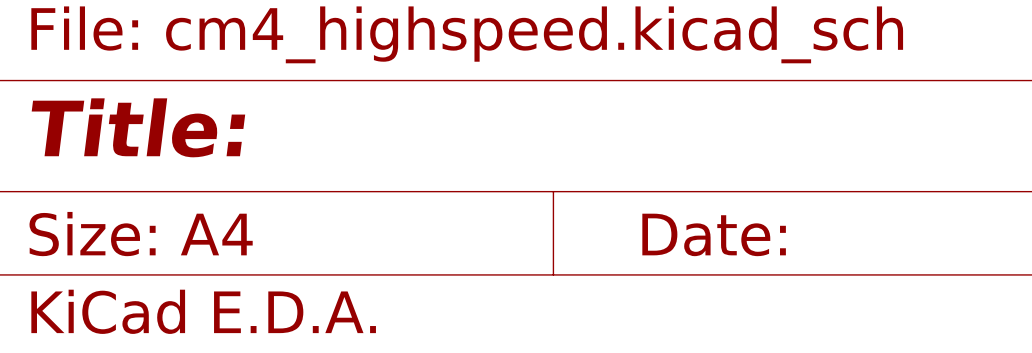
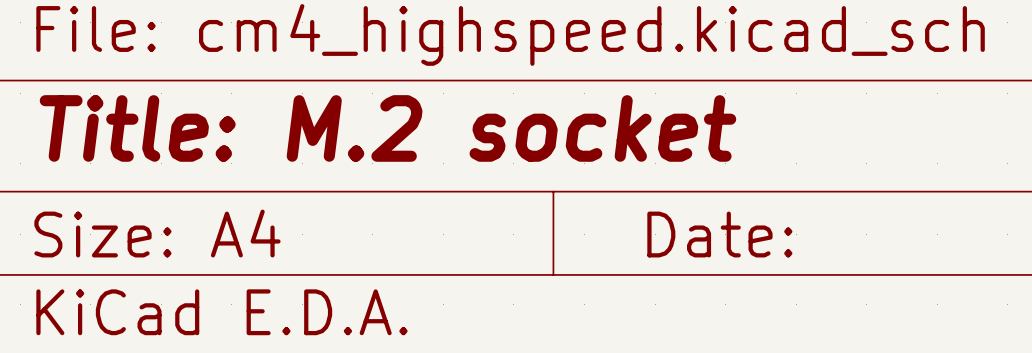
title block: Title: (138, 127) -> Title: M.2 socket (387, 128)

